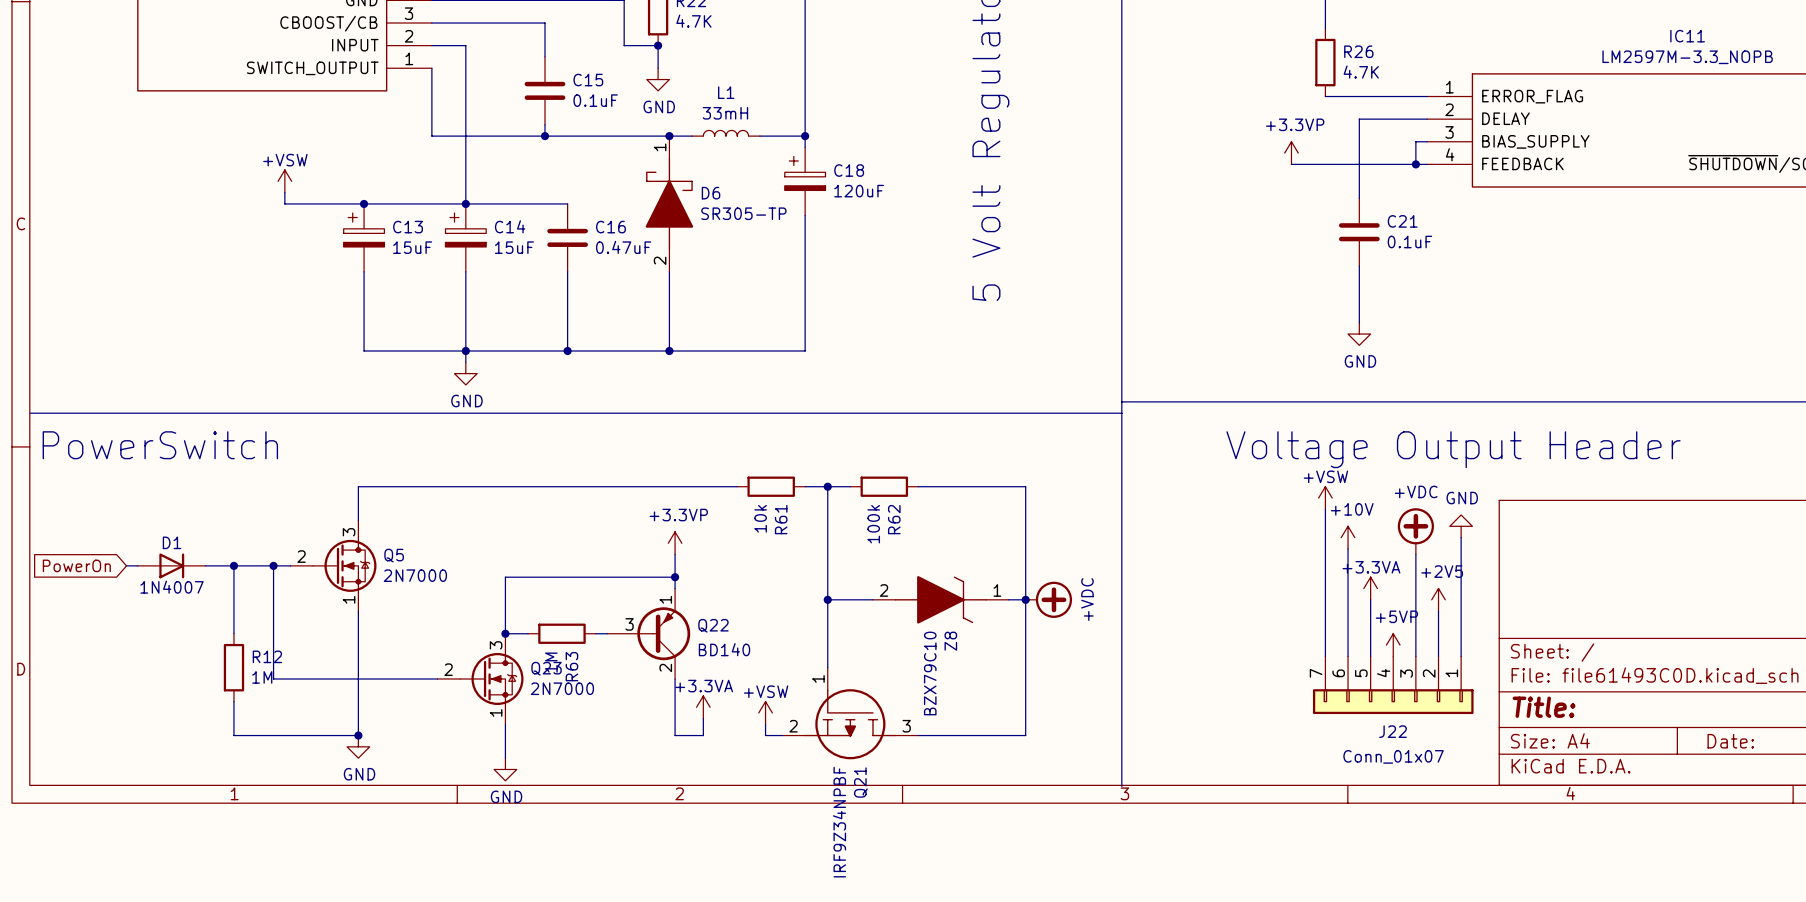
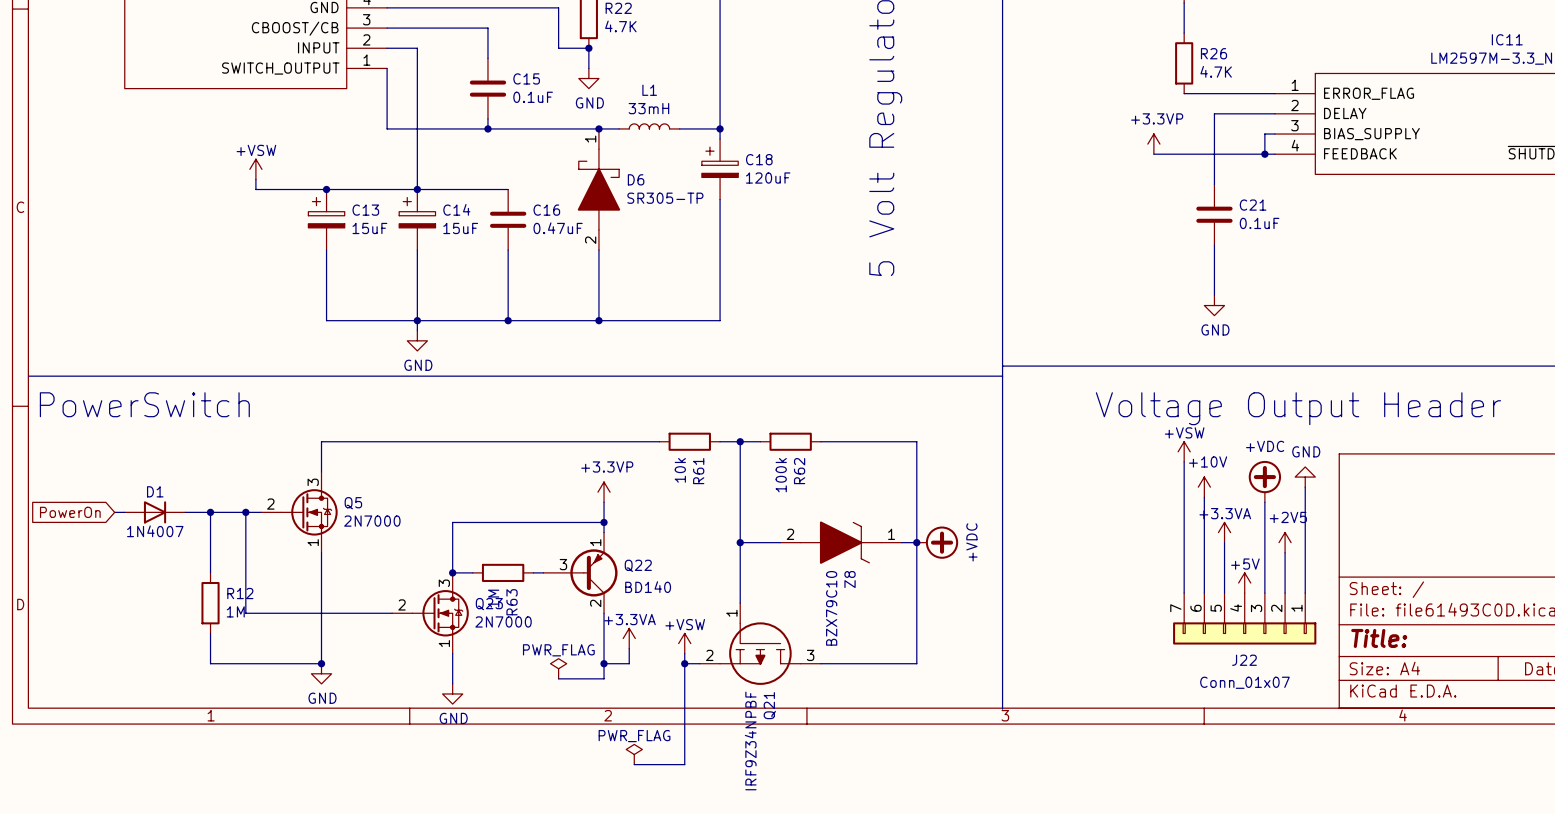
power symbol: +5VP (1393, 645) -> +5V (1244, 583)
wire: none -> (604, 663) (604, 678) (558, 678)
junction: none -> (604, 663)
wire: none -> (684, 663) (684, 764) (634, 764)
junction: none -> (684, 663)
power symbol: none -> PWR_FLAG (558, 668)
power symbol: none -> PWR_FLAG (634, 754)

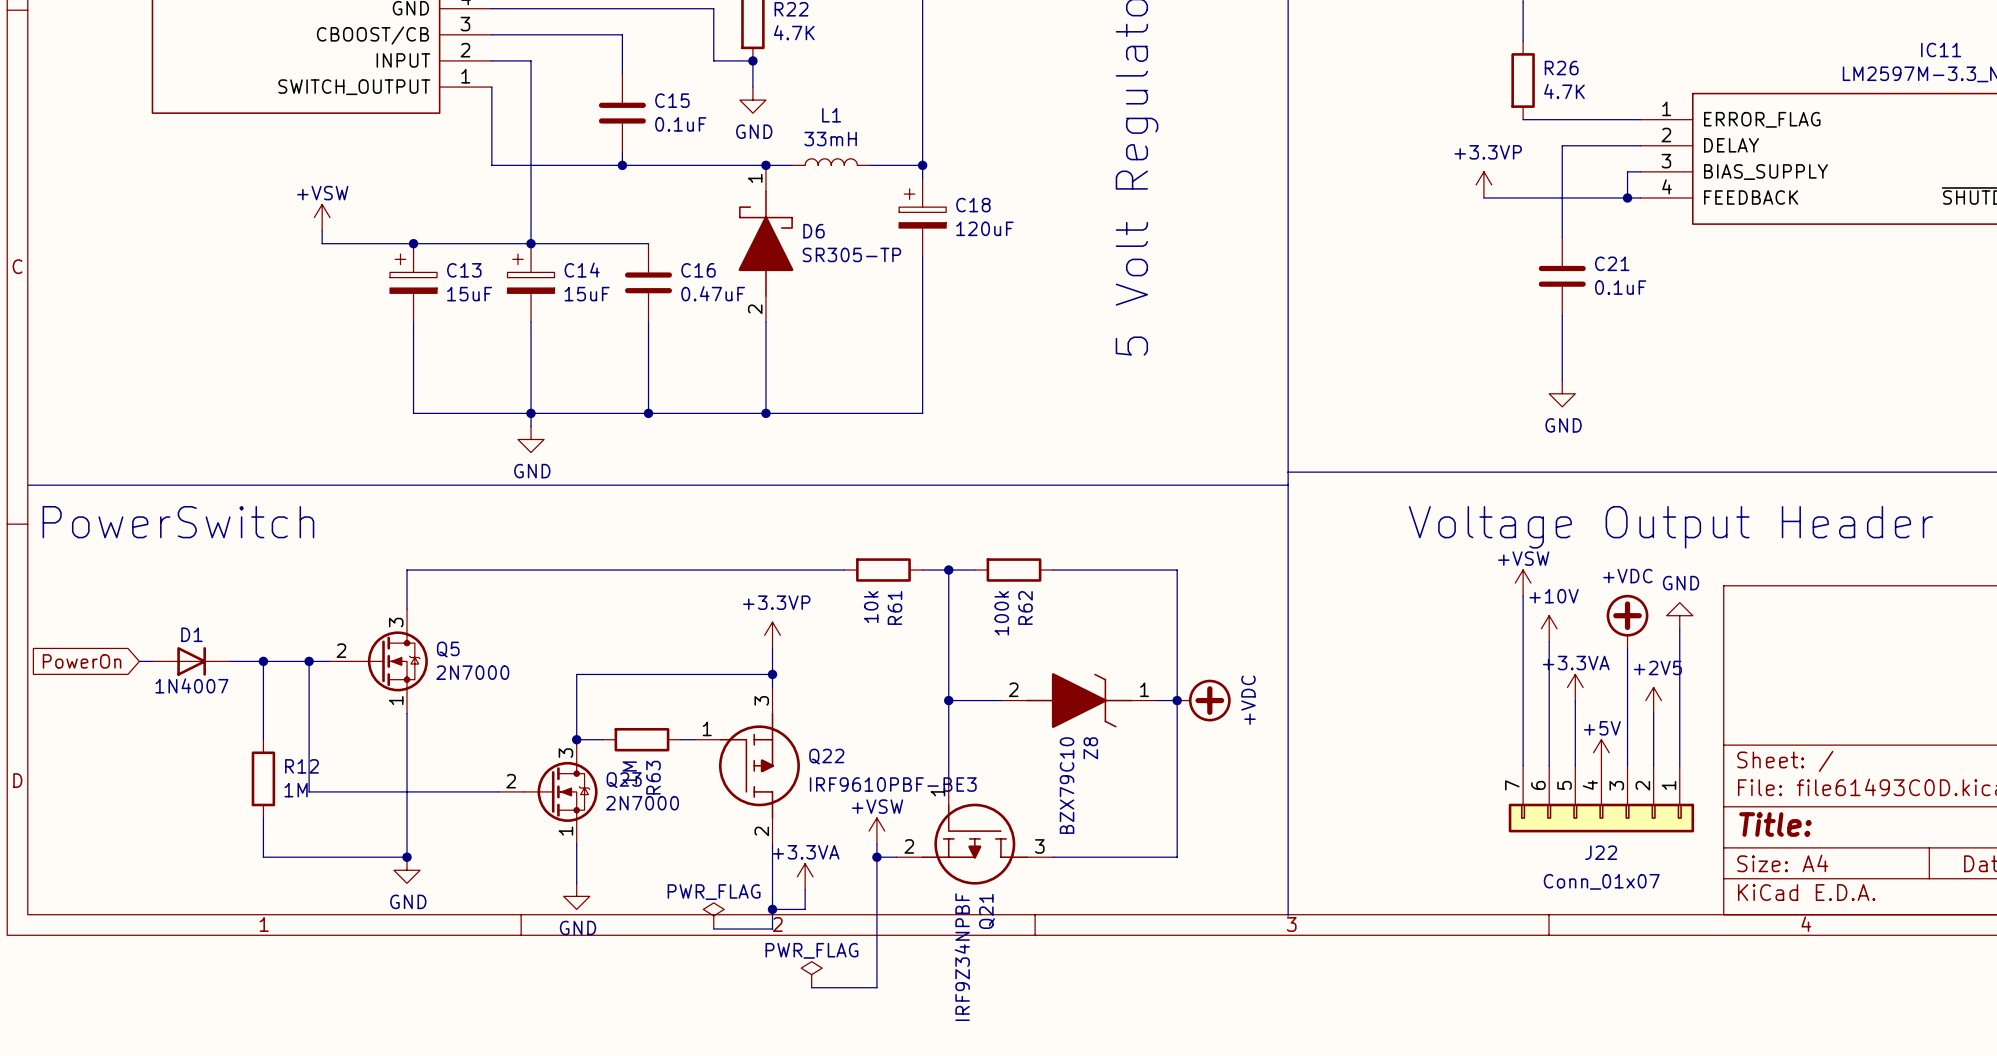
Q22 symbol: [543, 532, 618, 614] -> [694, 687, 800, 845]
Q22 value: BD140 (648, 587) -> IRF9610PBF-BE3 (893, 784)
power symbol position: +3.3VA (629, 638) -> +3.3VA (805, 876)
wire: (629, 648) (629, 663) (604, 663) -> (805, 889) (805, 909) (772, 909)
junction position: (604, 663) -> (772, 909)
power symbol position: PWR_FLAG (558, 668) -> PWR_FLAG (713, 915)
wire: (558, 678) (604, 678) -> (713, 929) (772, 929) (772, 876)

